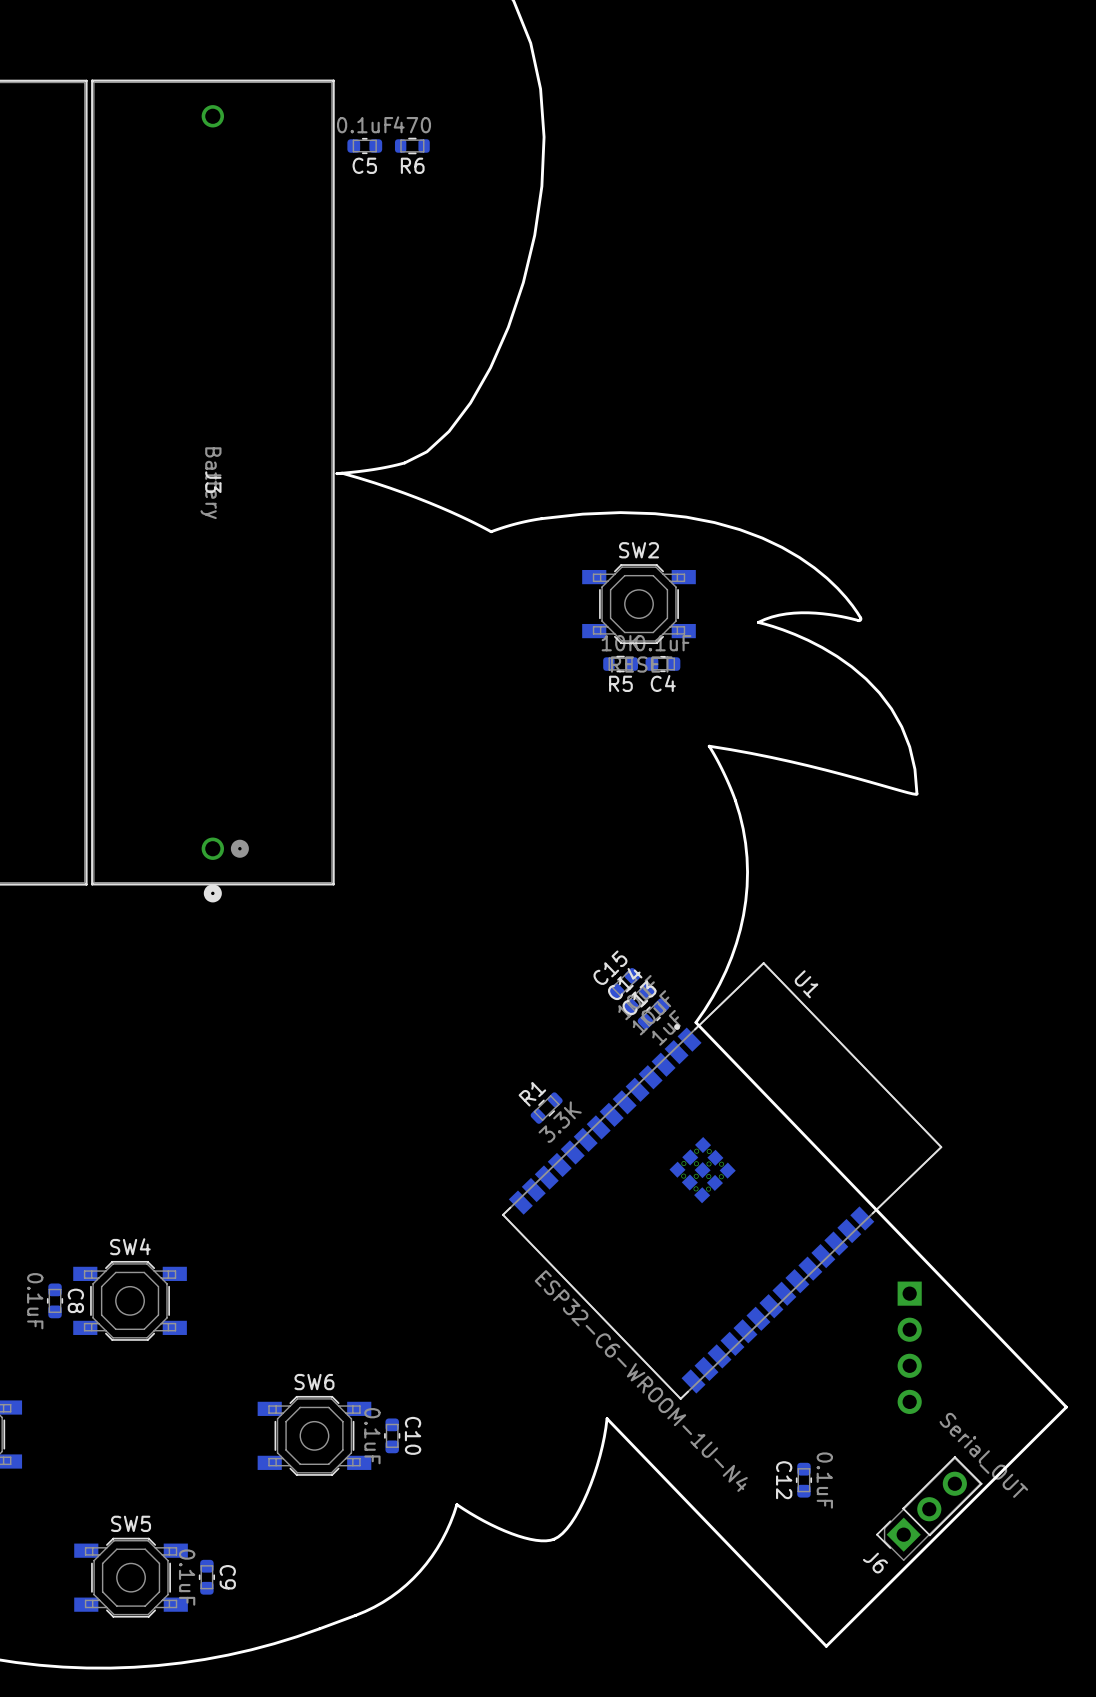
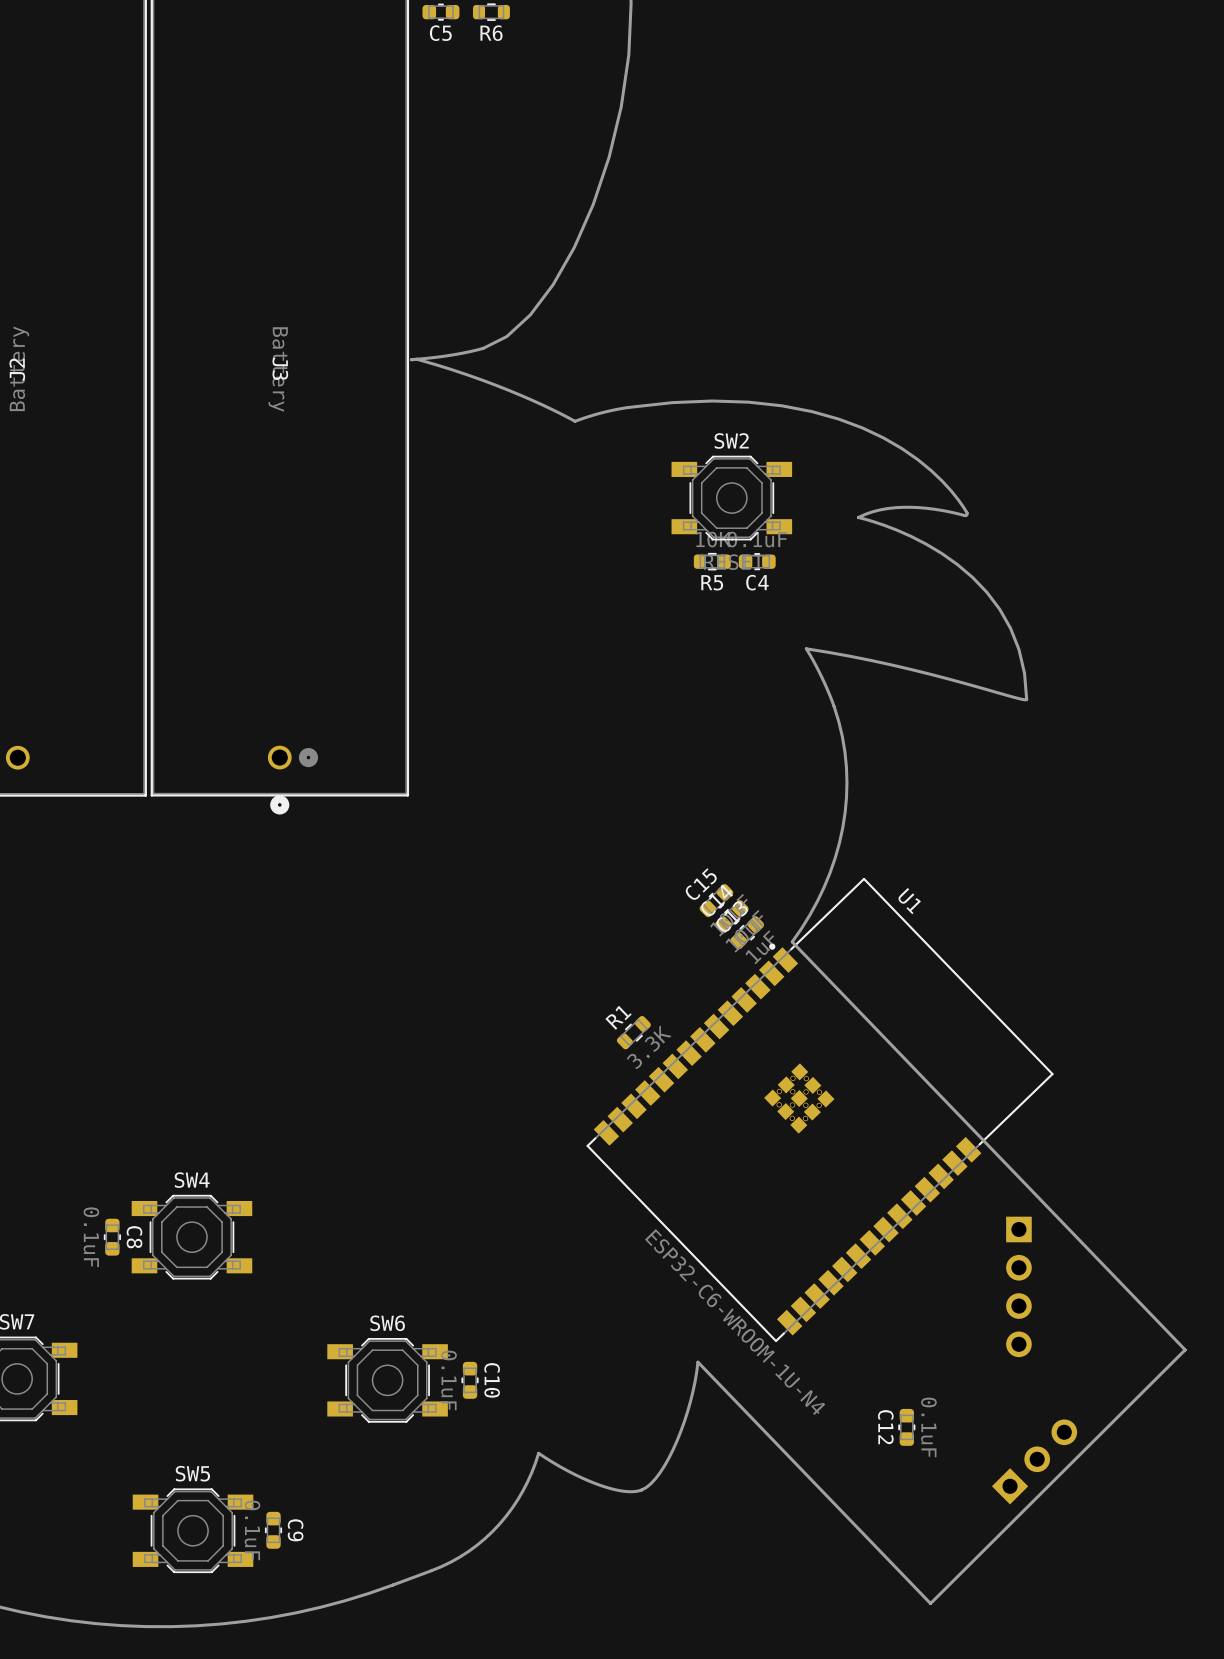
J6 side: bottom (929, 1508) -> top (1034, 1461)

